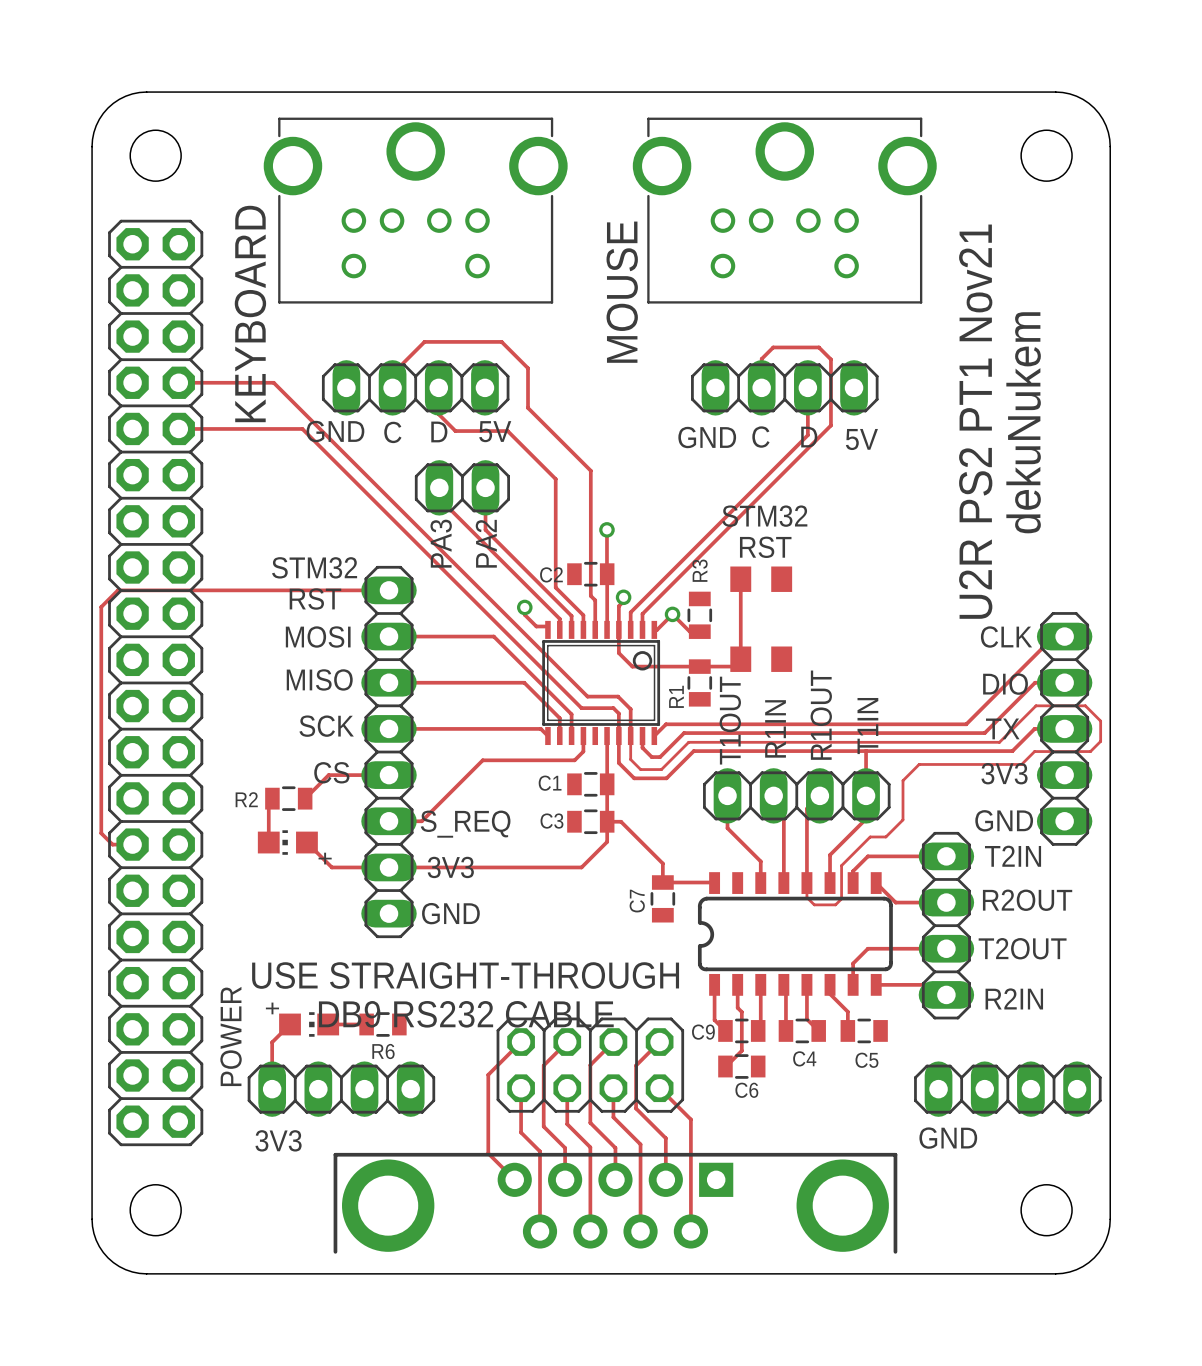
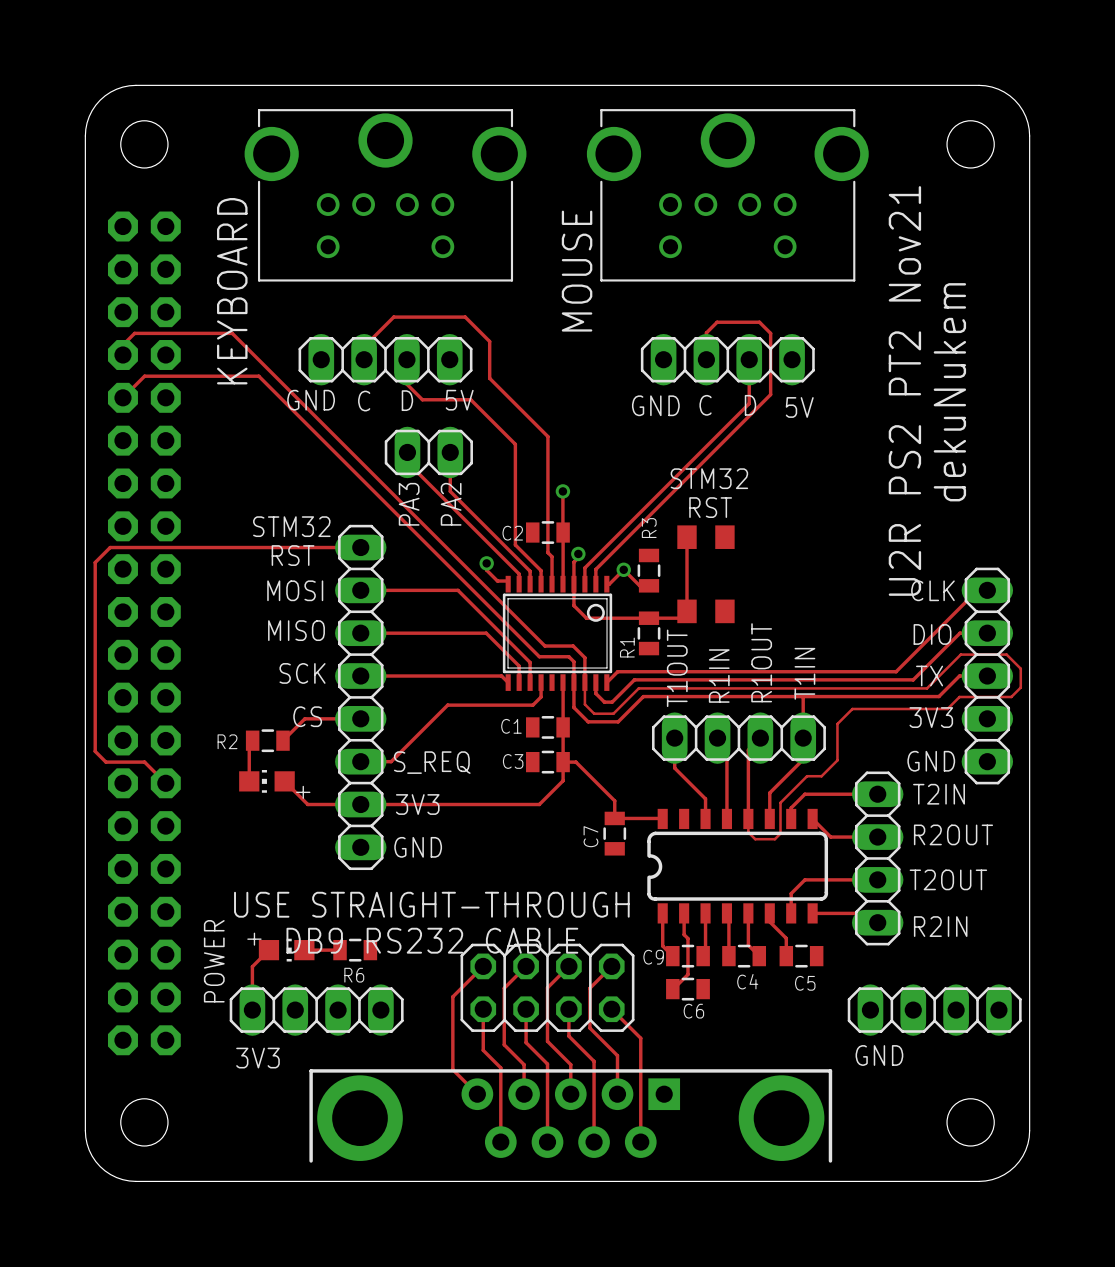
track: (178, 382) (273, 382) -> (122, 354) (122, 345) (134, 333) (232, 333) (253, 354)
text: U2R PS2 PT1 Nov21 (975, 421) -> U2R PS2 PT2 Nov21 (904, 390)
track: (178, 428) (302, 428) -> (122, 397) (144, 376) (258, 376) (280, 397)
track: (118, 590) (101, 607) (101, 833) (112, 844) (132, 844) -> (110, 547) (95, 562) (95, 751) (105, 762) (144, 762) (165, 783)
part side: top (155, 682) -> bottom (144, 633)

